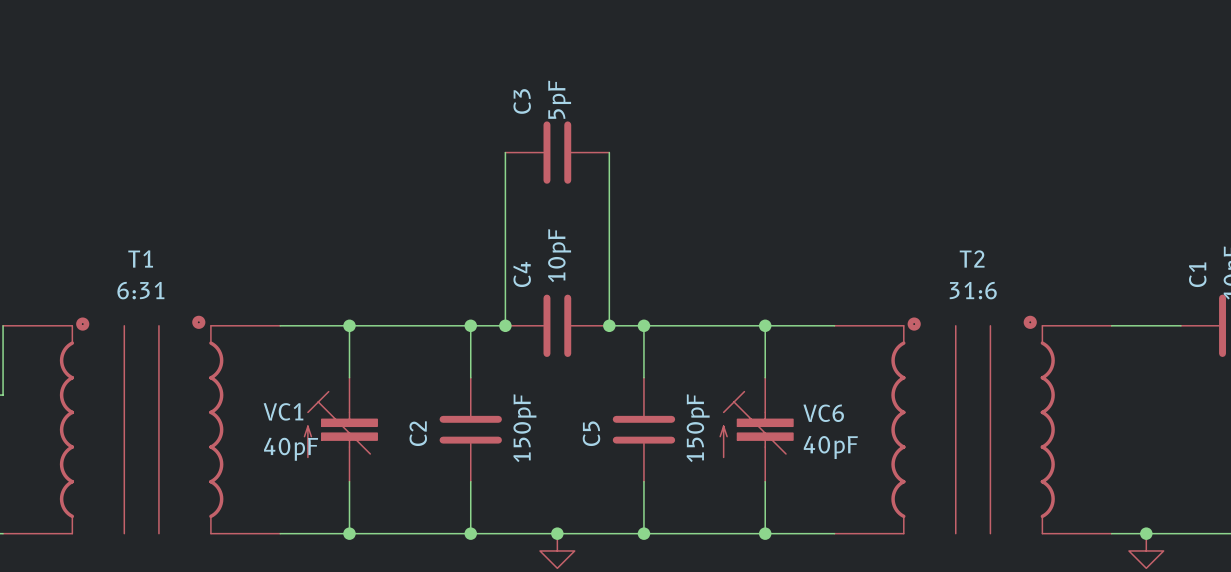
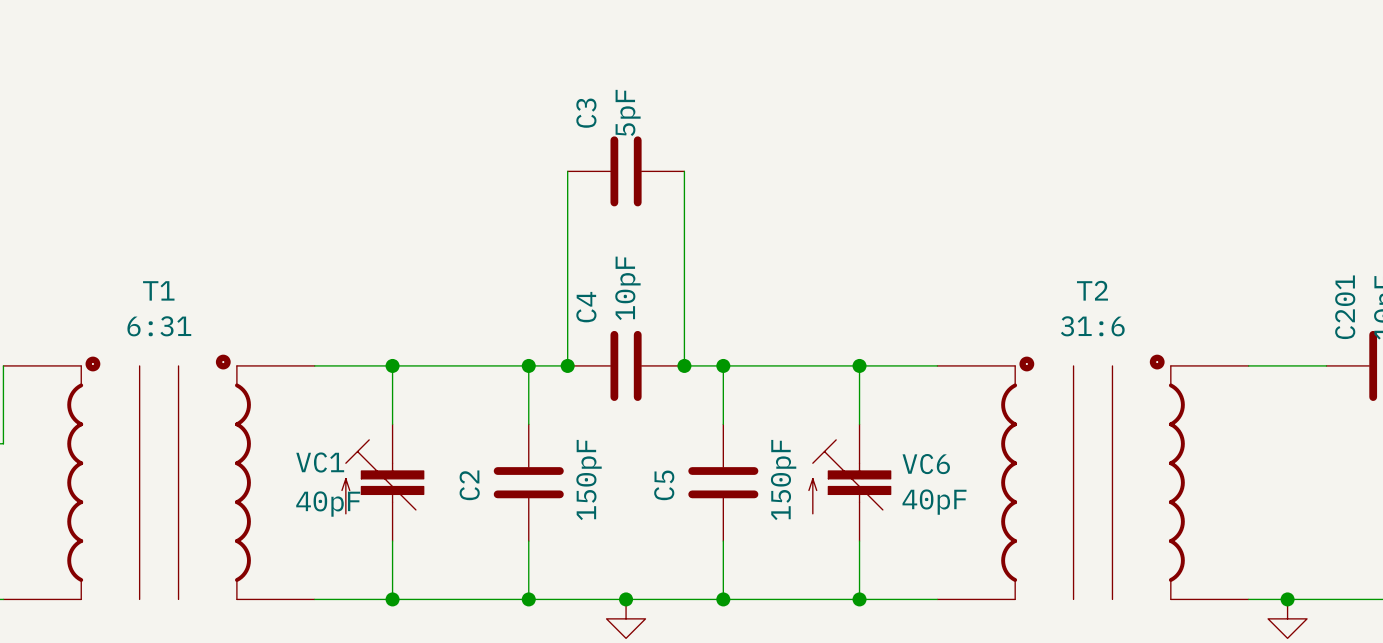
C1 name: C1 (1197, 274) -> C201 (1345, 307)

